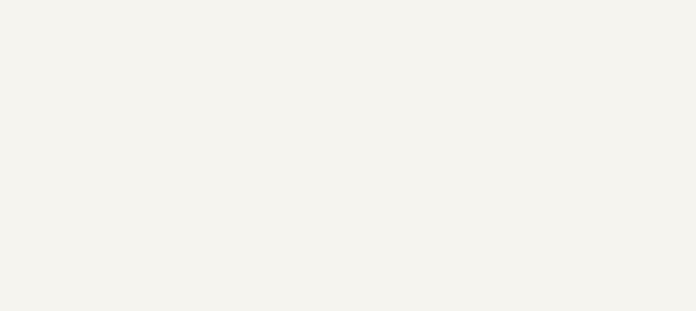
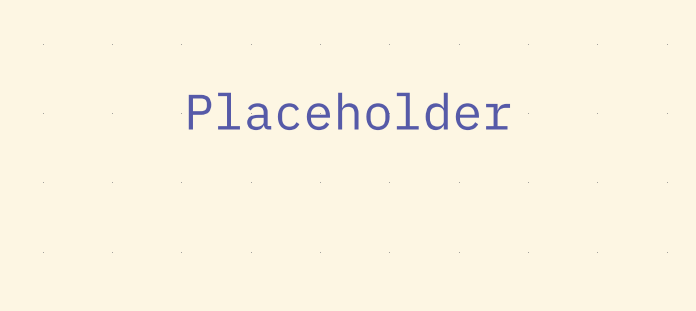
text: none -> Placeholder (349, 111)

